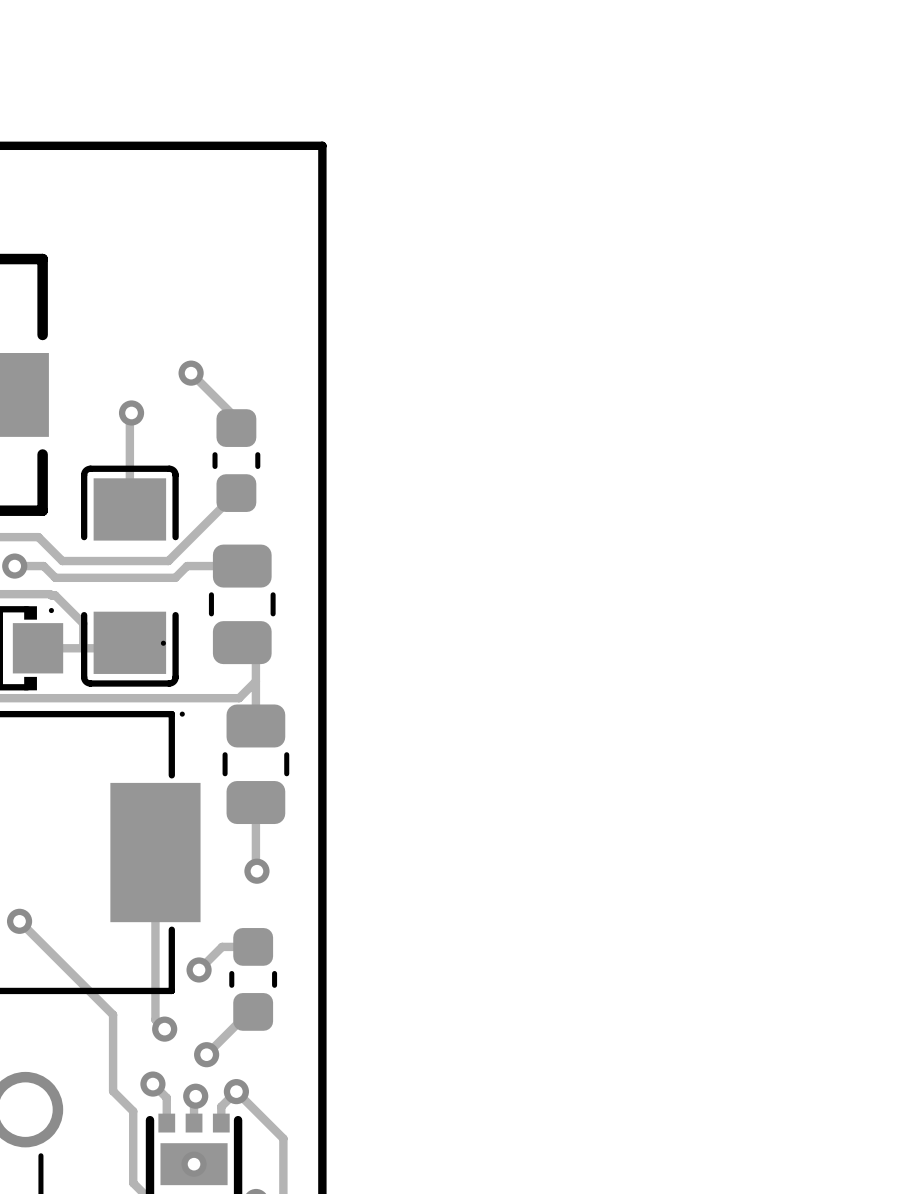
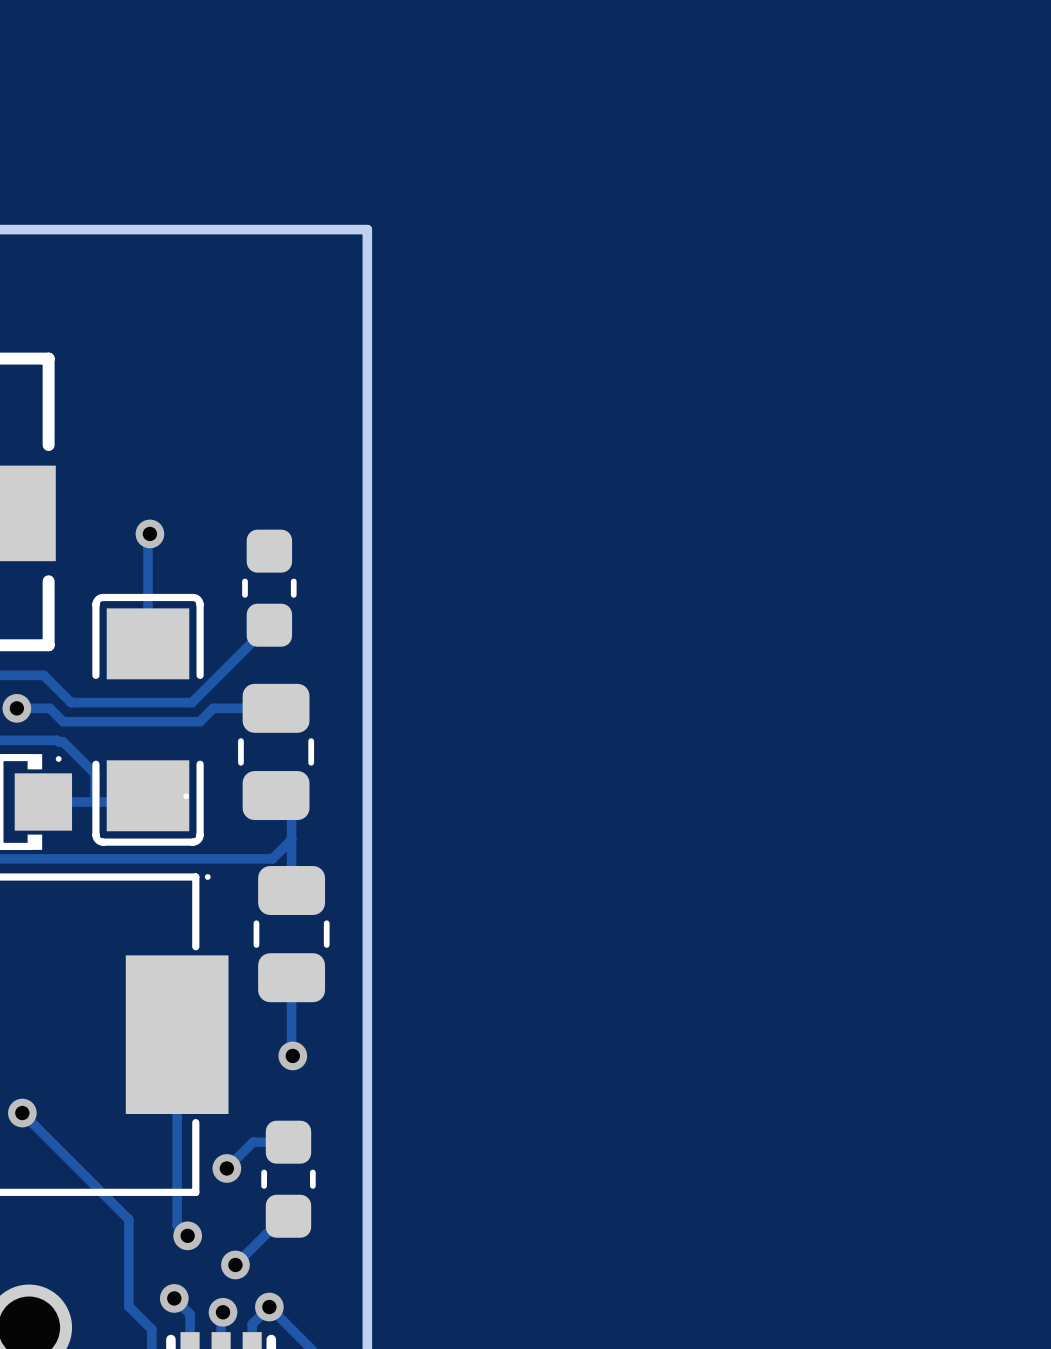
track: (191, 373) (236, 418) (236, 428) -> none
via: (191, 373) -> none

